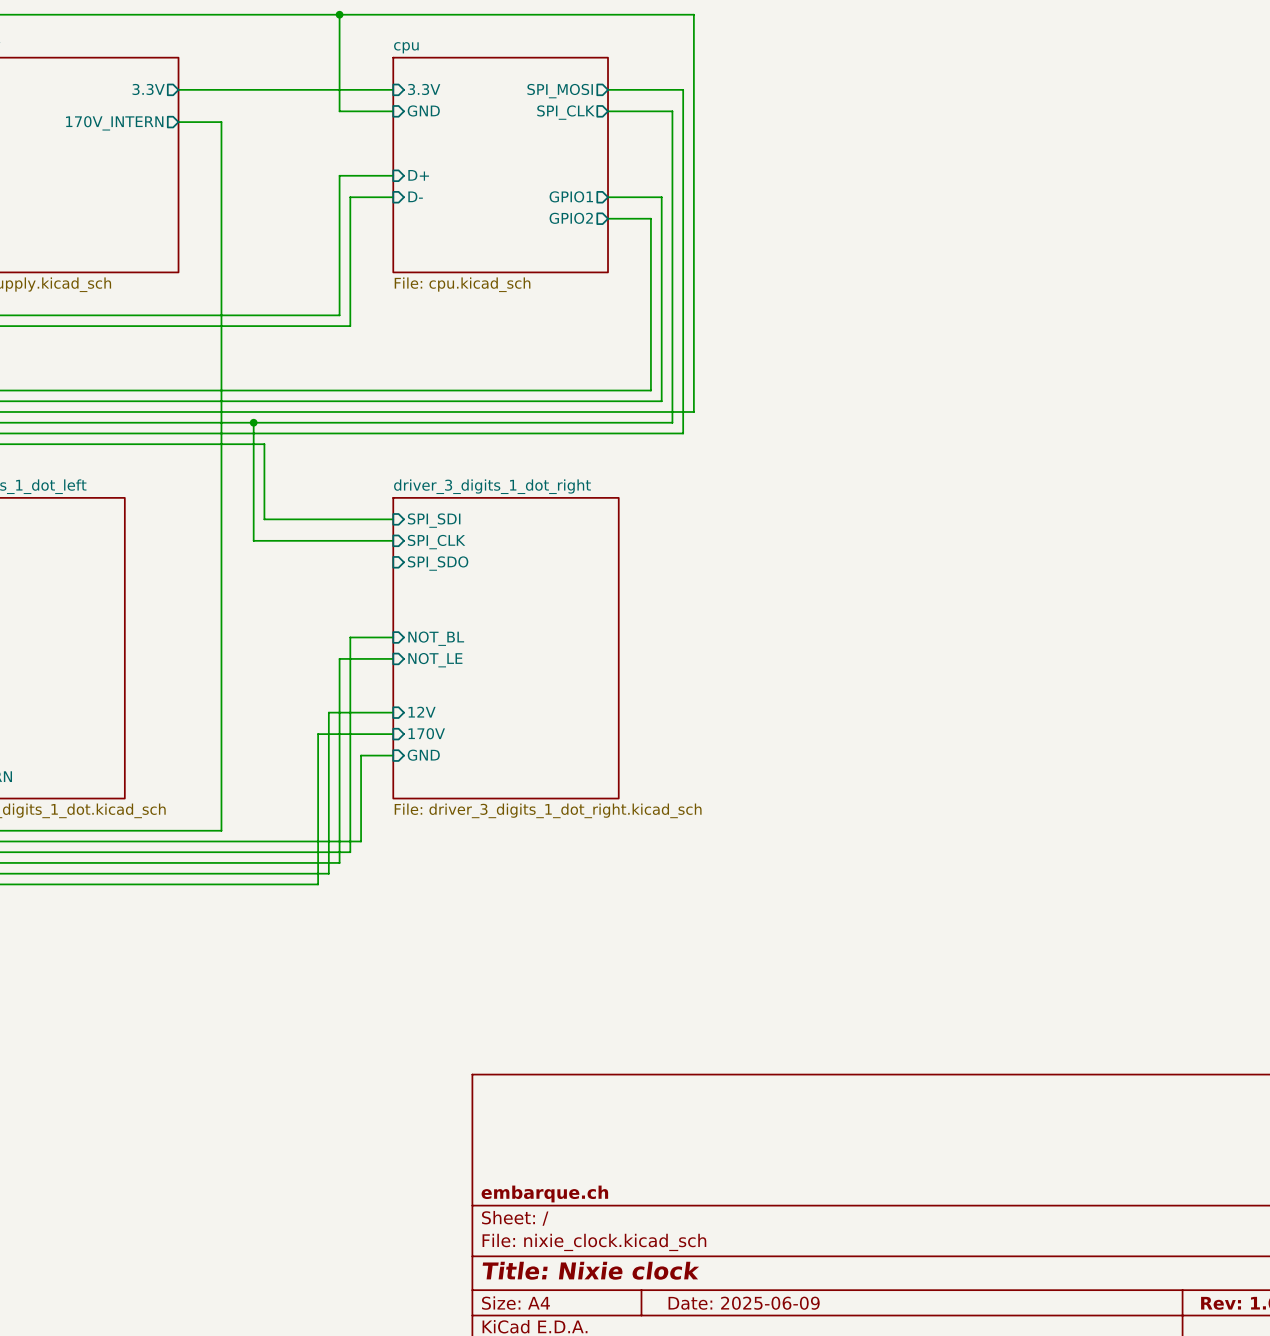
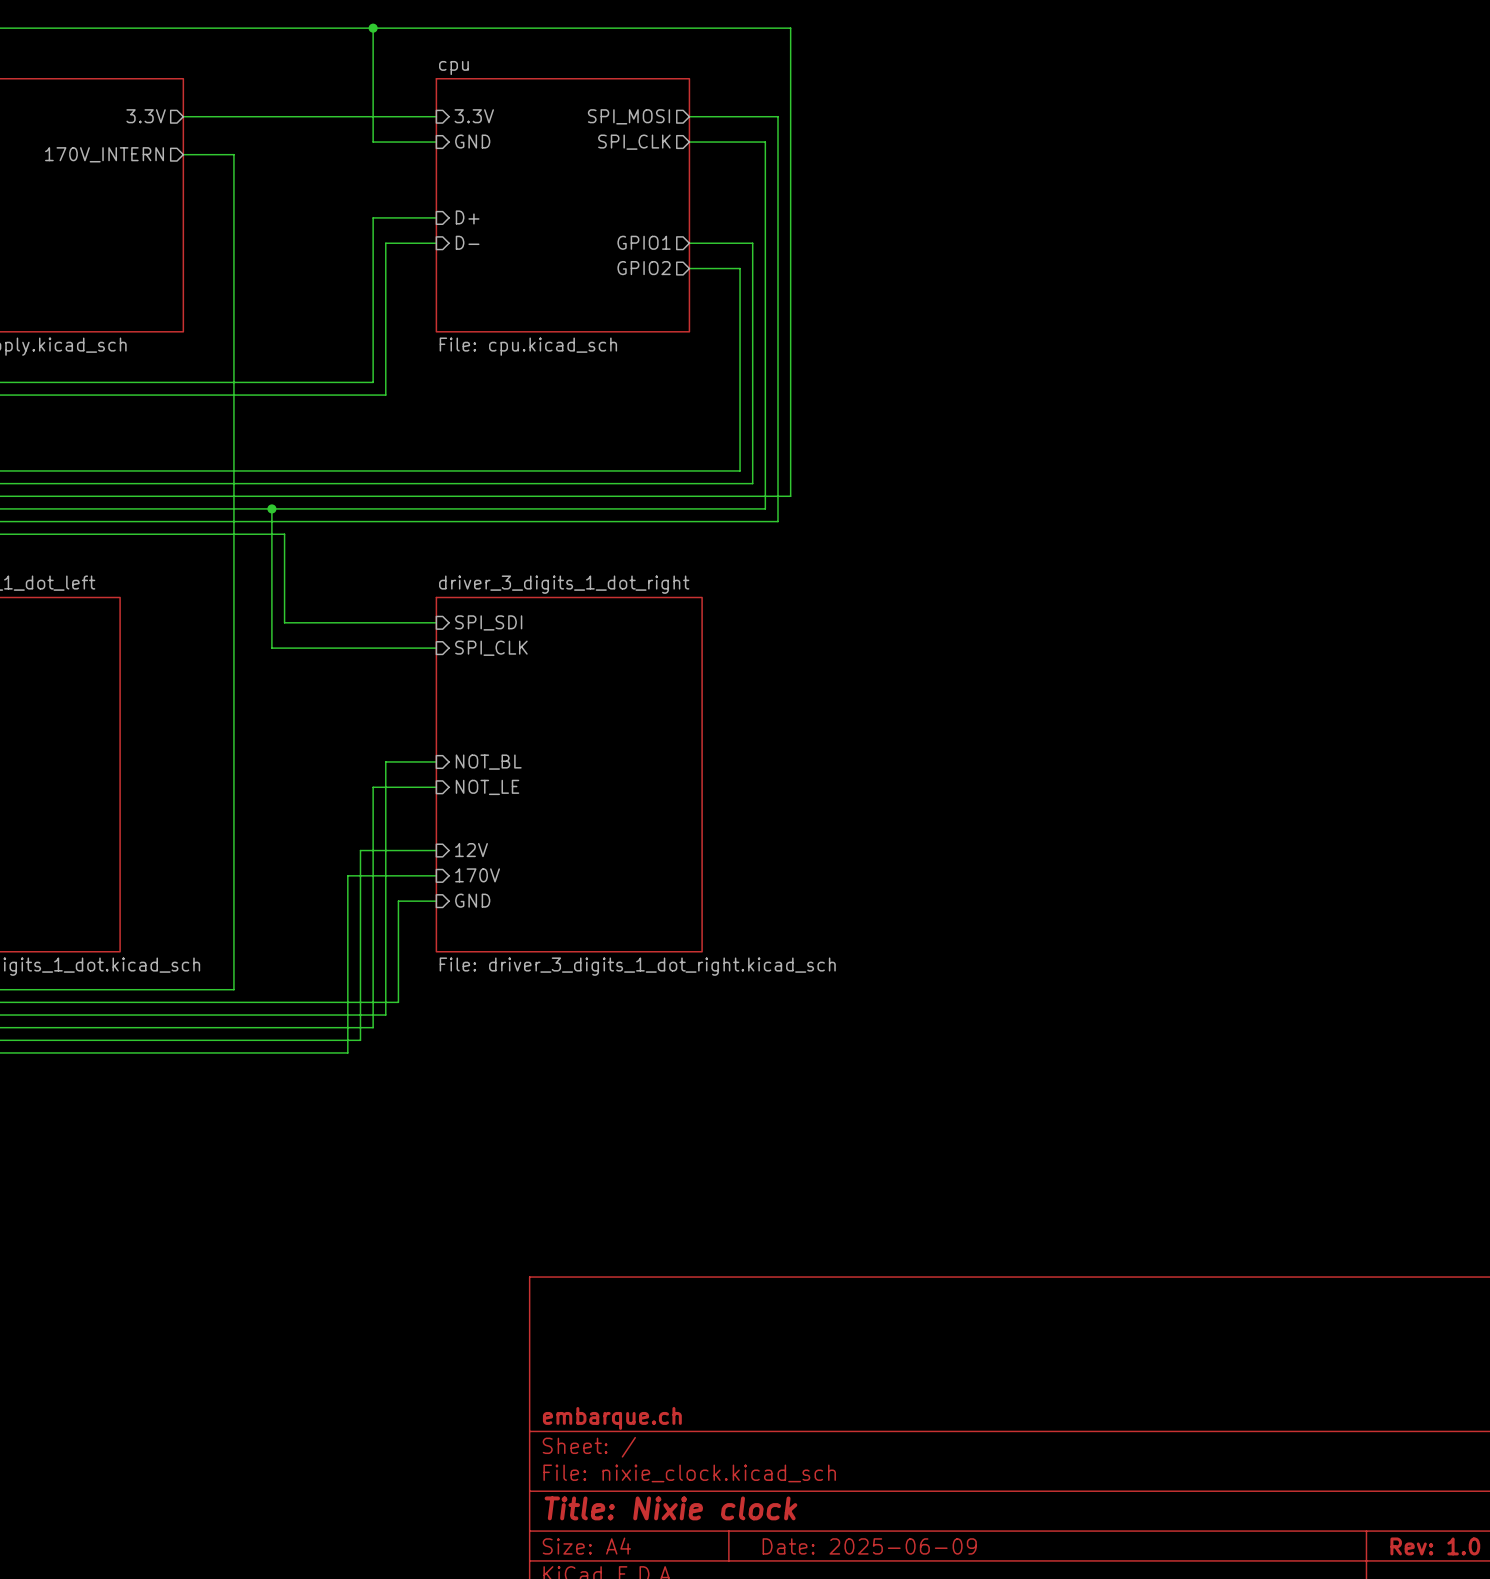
sheet pin: SPI_SDO (438, 563) -> none

